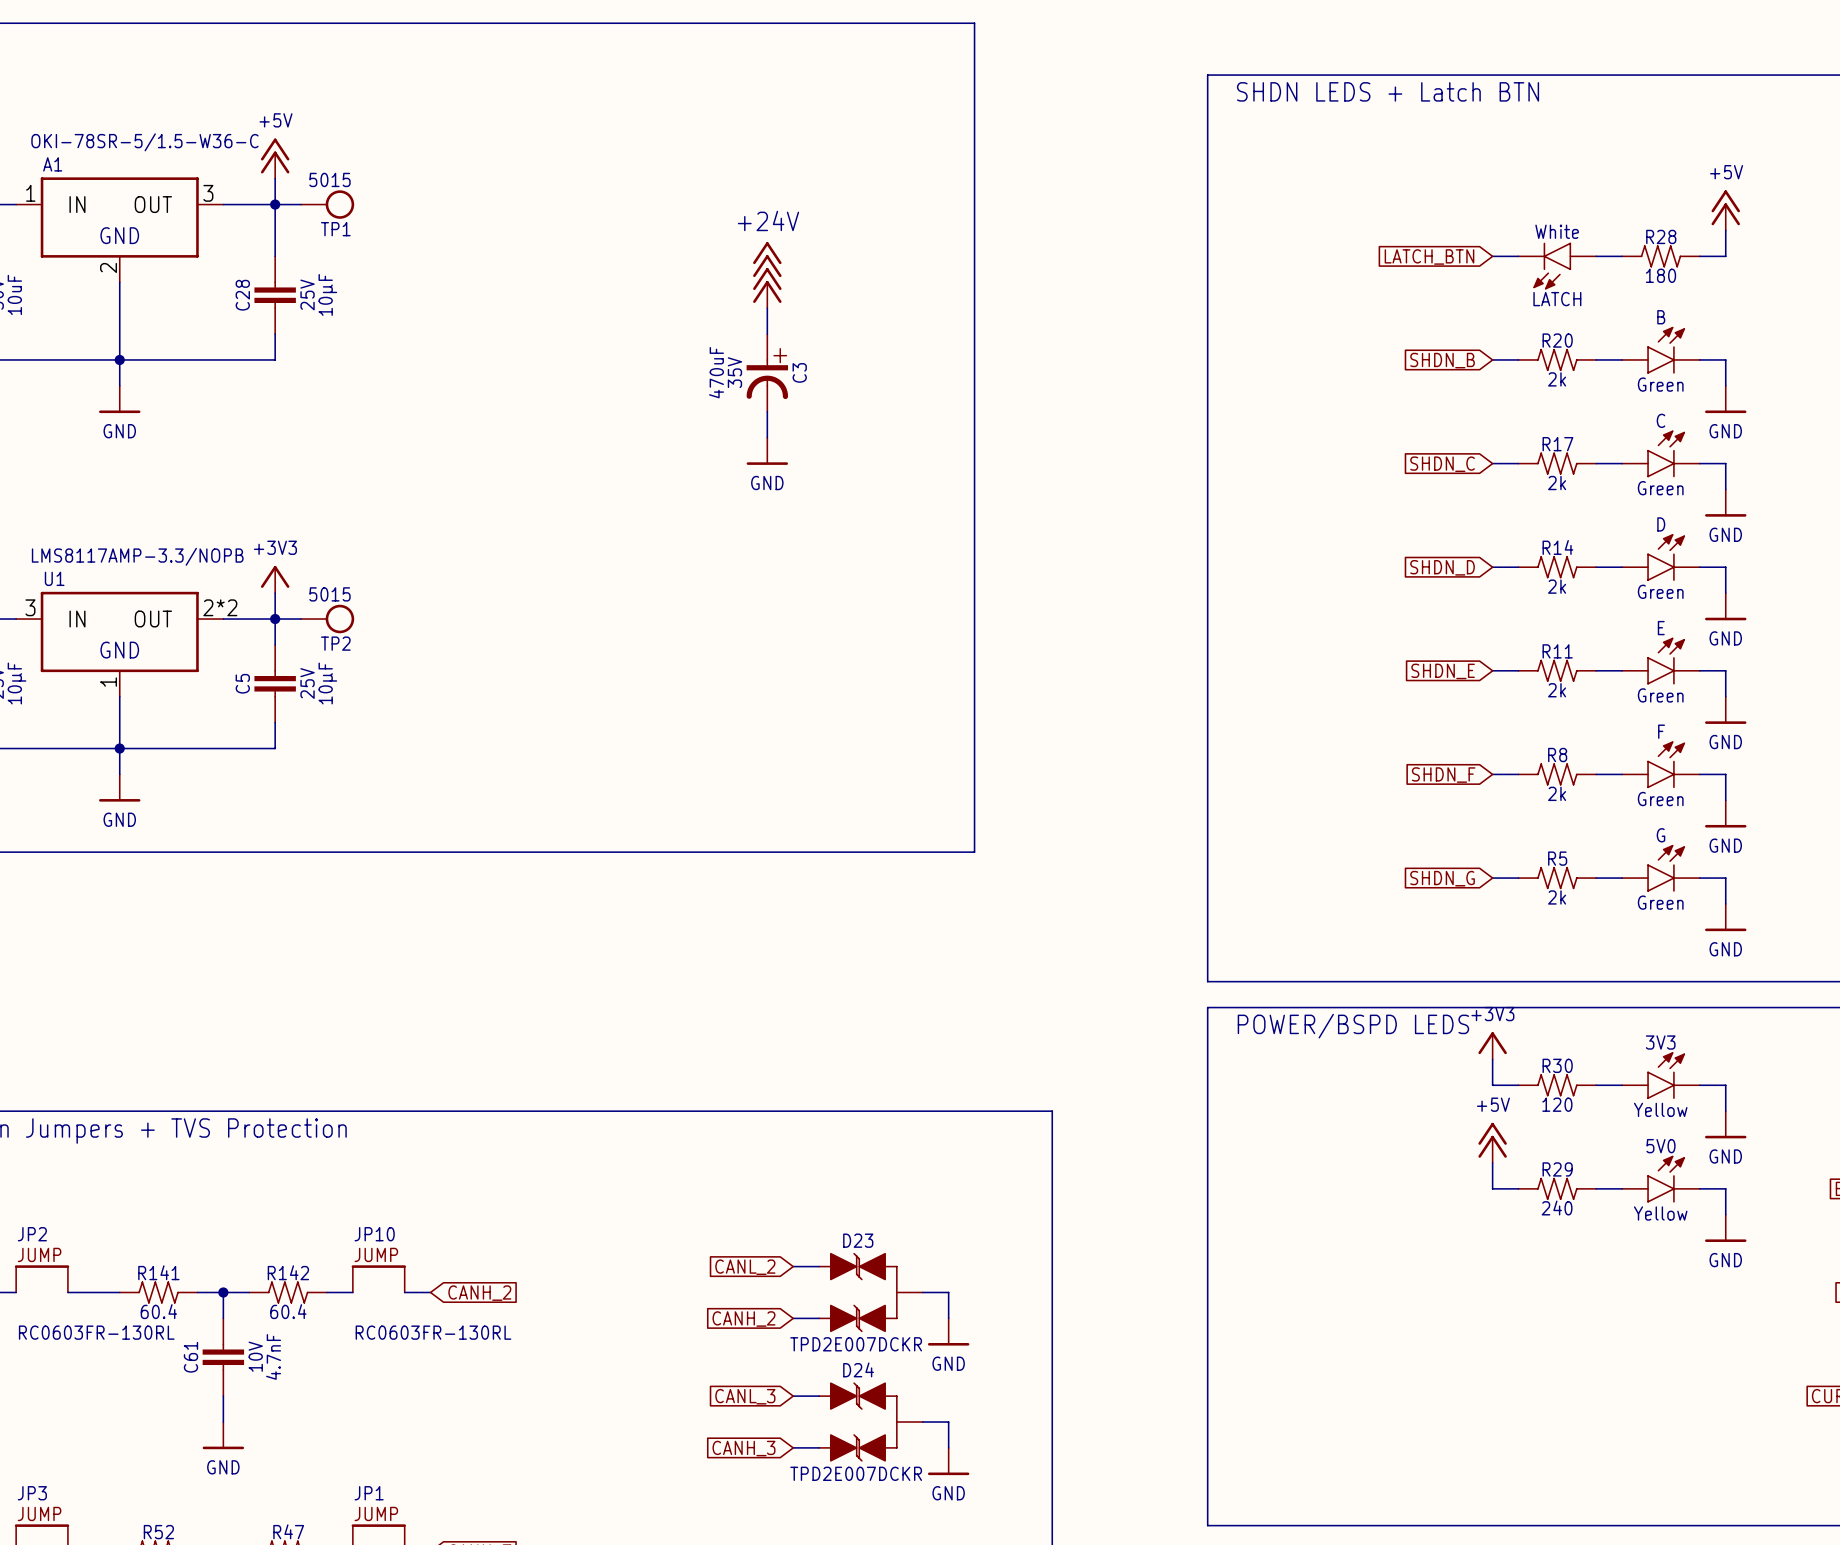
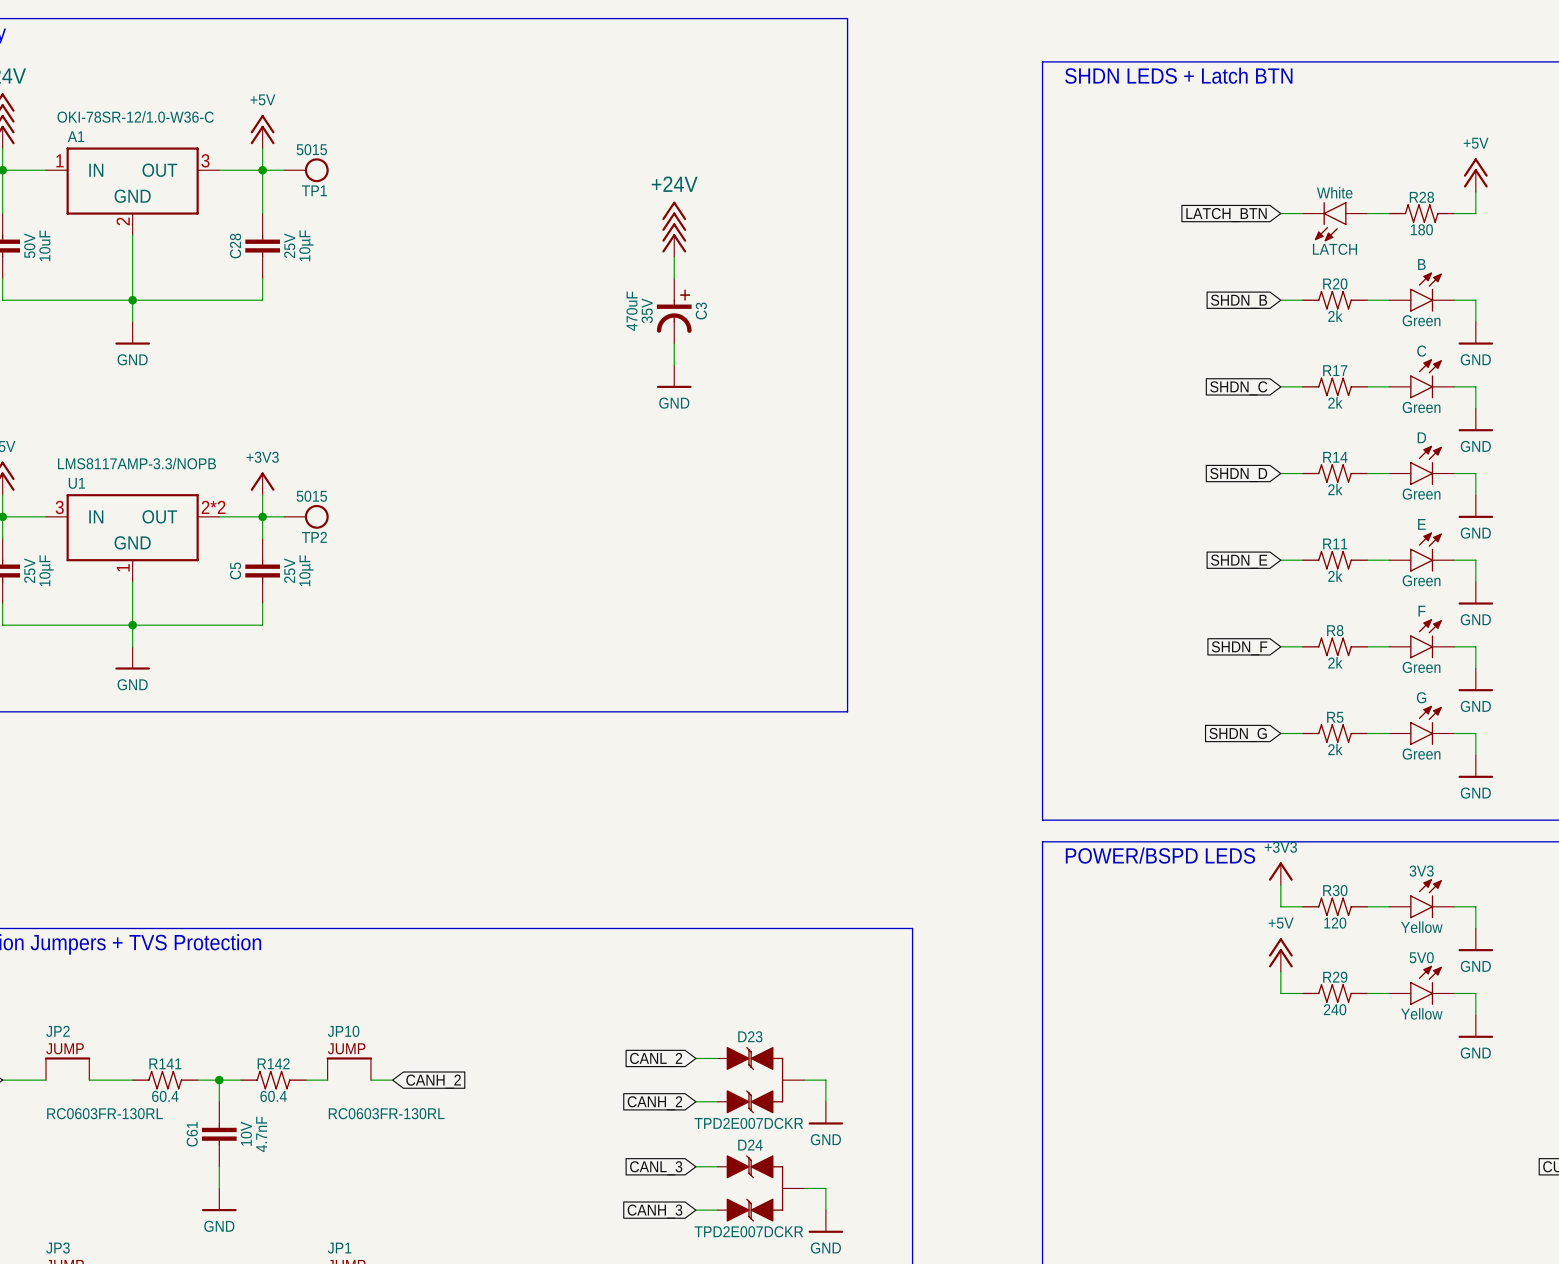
A1 text: OKI-78SR-5/1.5-W36-C (144, 142) -> OKI-78SR-12/1.0-W36-C (135, 116)

